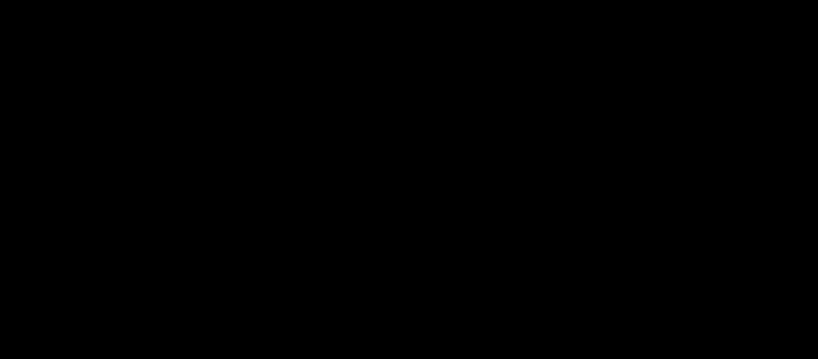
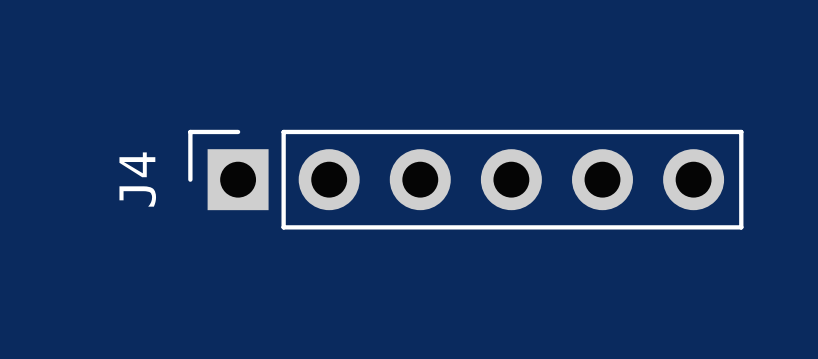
J4: none -> (465, 179)

